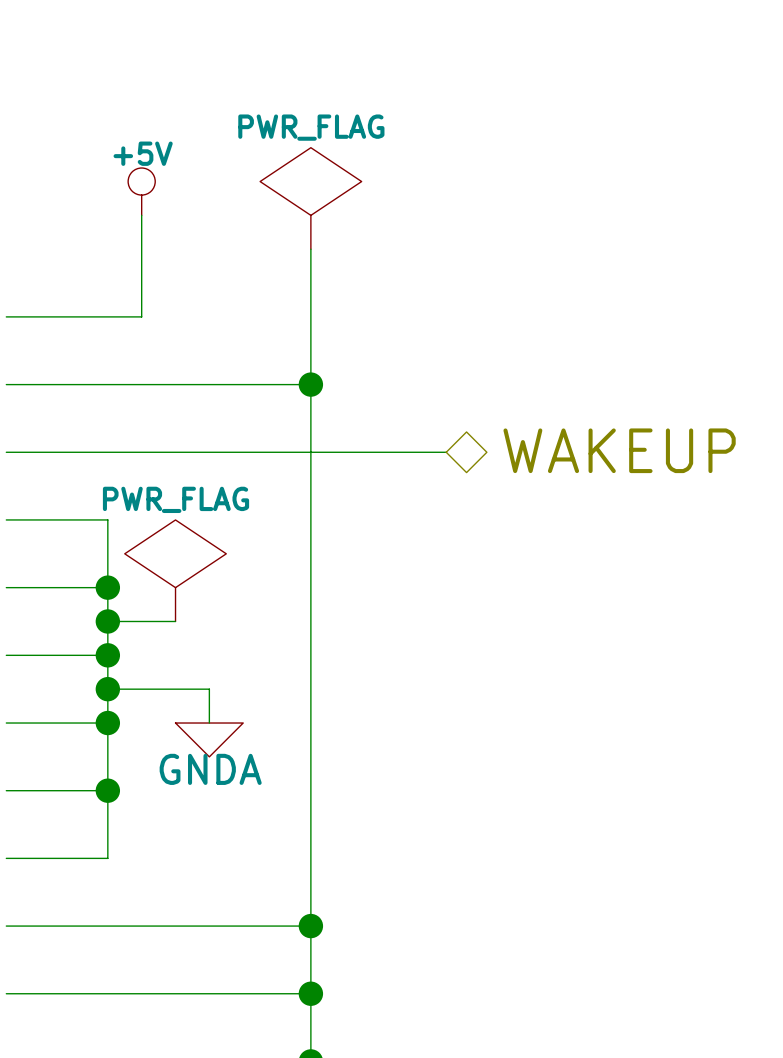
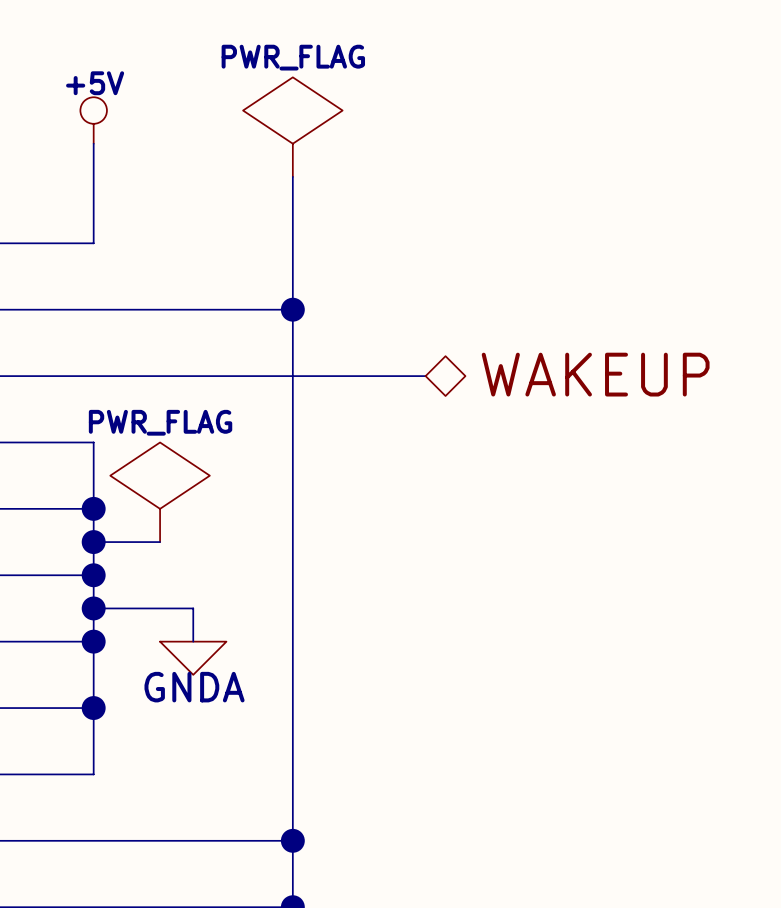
power symbol position: +5V (141, 191) -> +5V (93, 120)
wire: (141, 215) (141, 316) (107, 316) -> (93, 143) (93, 243)

